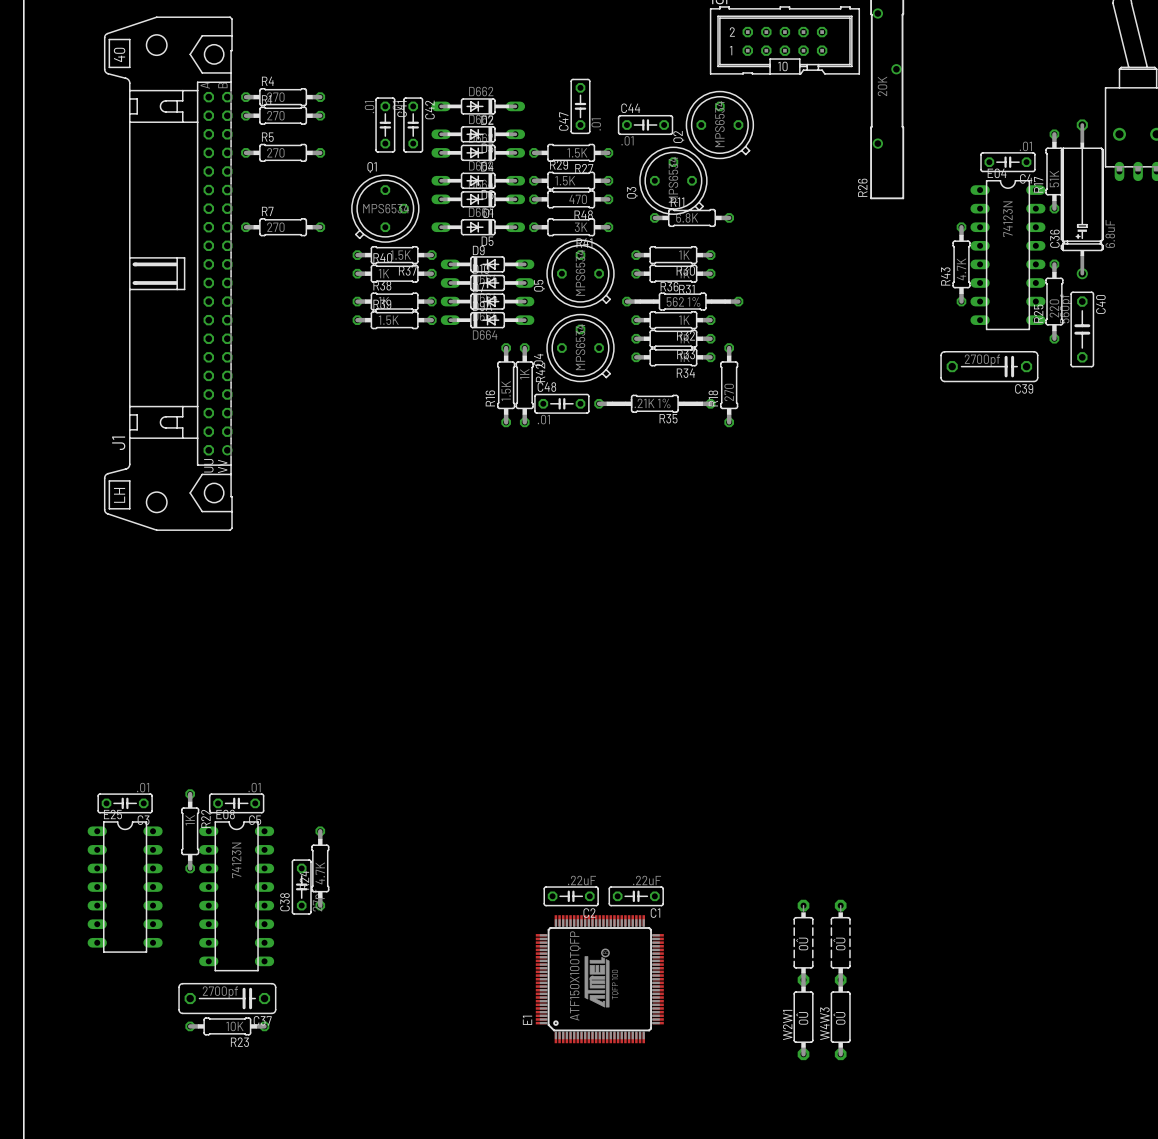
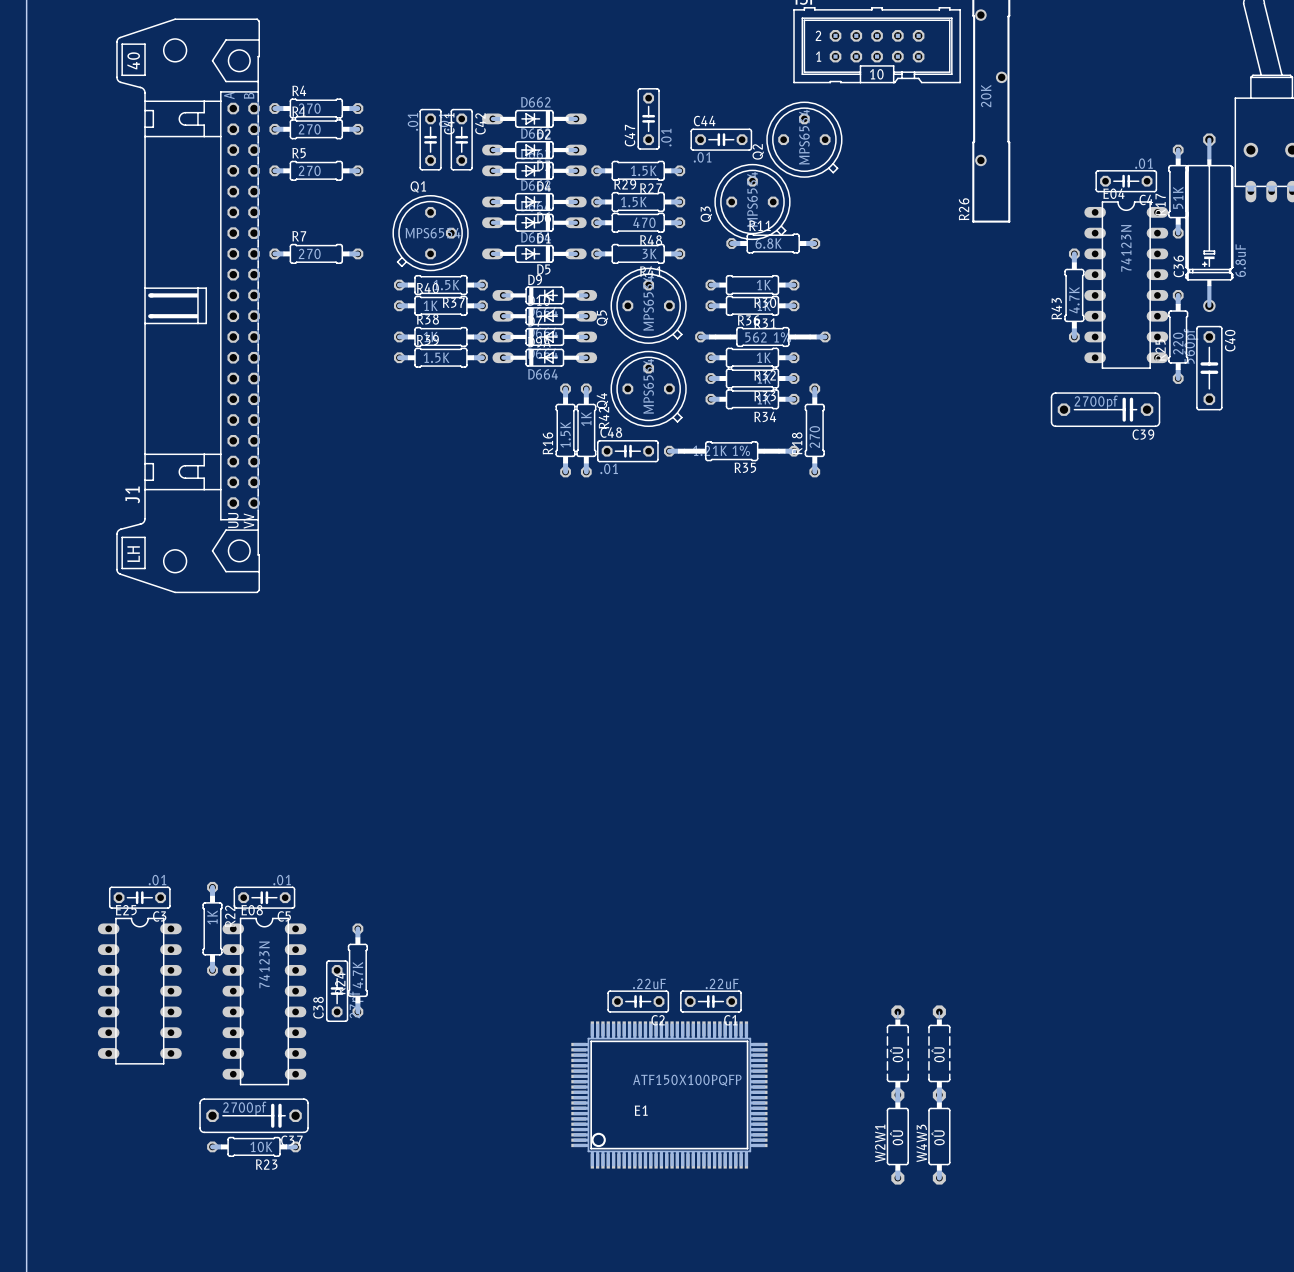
E1 footprint: [535, 915, 664, 1044] -> [571, 1021, 768, 1169]
E1 value: ATF150X100TQFP (575, 976) -> ATF150X100PQFP (687, 1080)
E1 name position: E1 (527, 1020) -> E1 (641, 1110)

